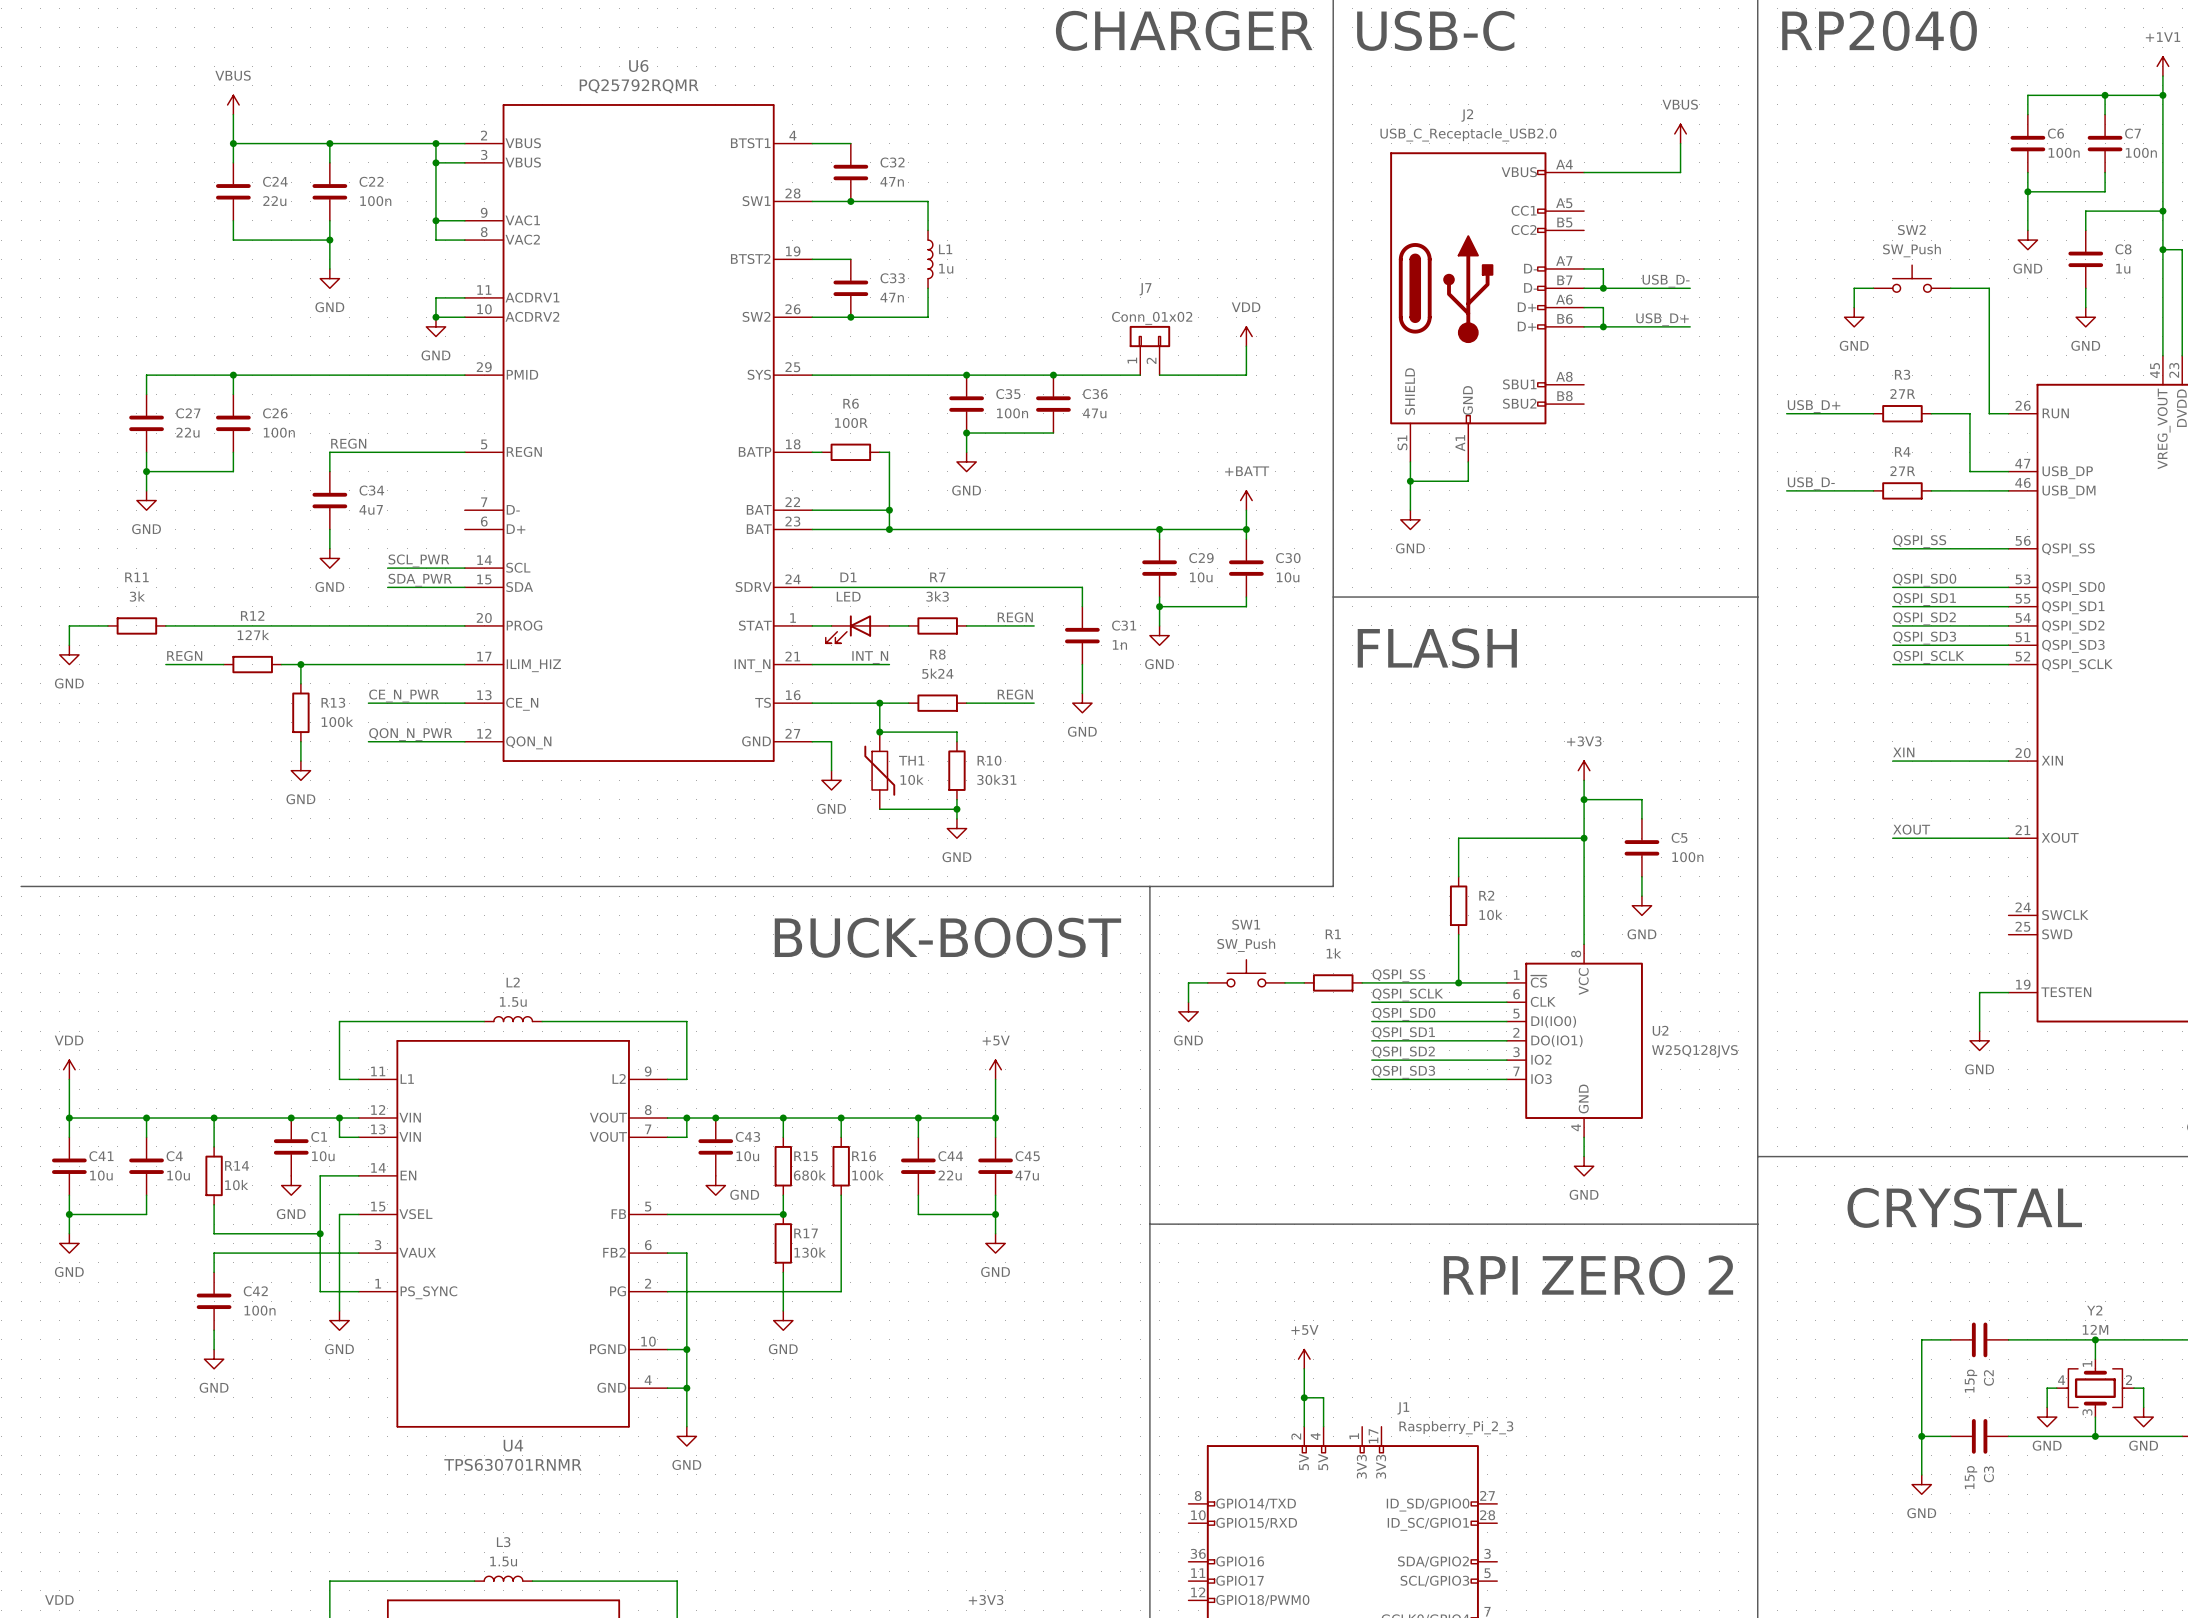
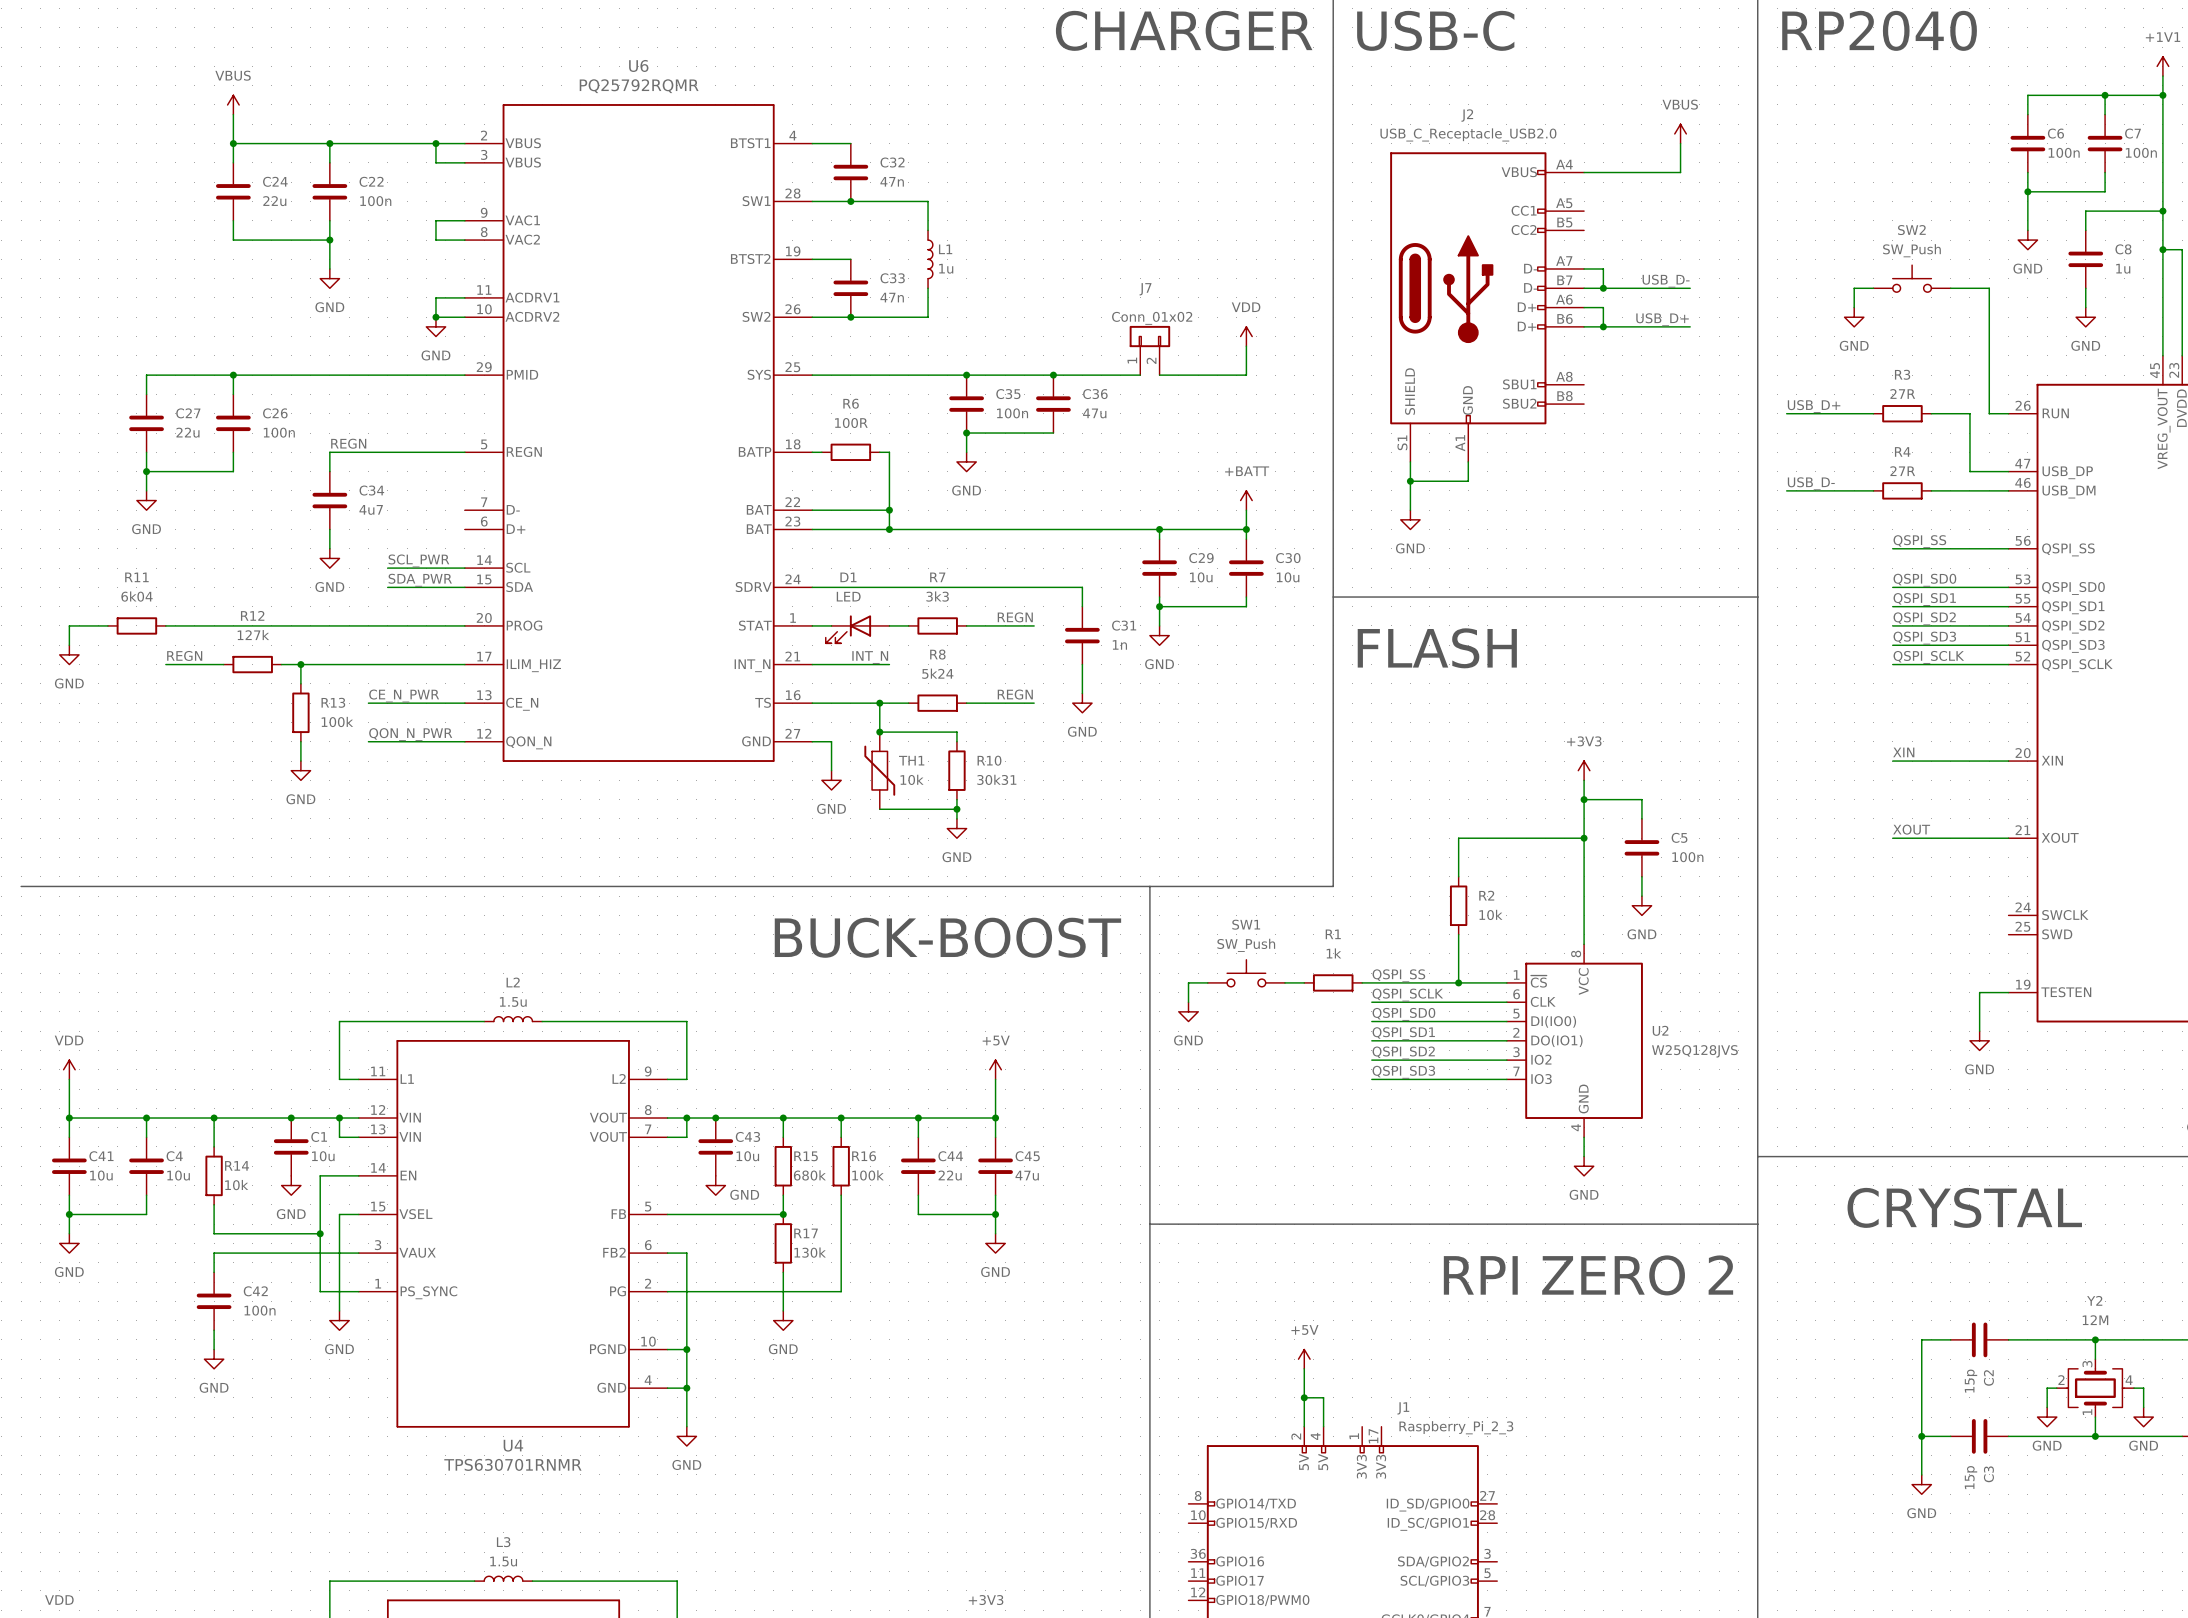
wire: (435, 162) (435, 220) -> none
junction: (435, 162) -> none
junction: (435, 220) -> none
R11 value: 3k (137, 596) -> 6k04 (136, 596)
Y2 rotation: 0° (2095, 1388) -> 180° (2095, 1388)

